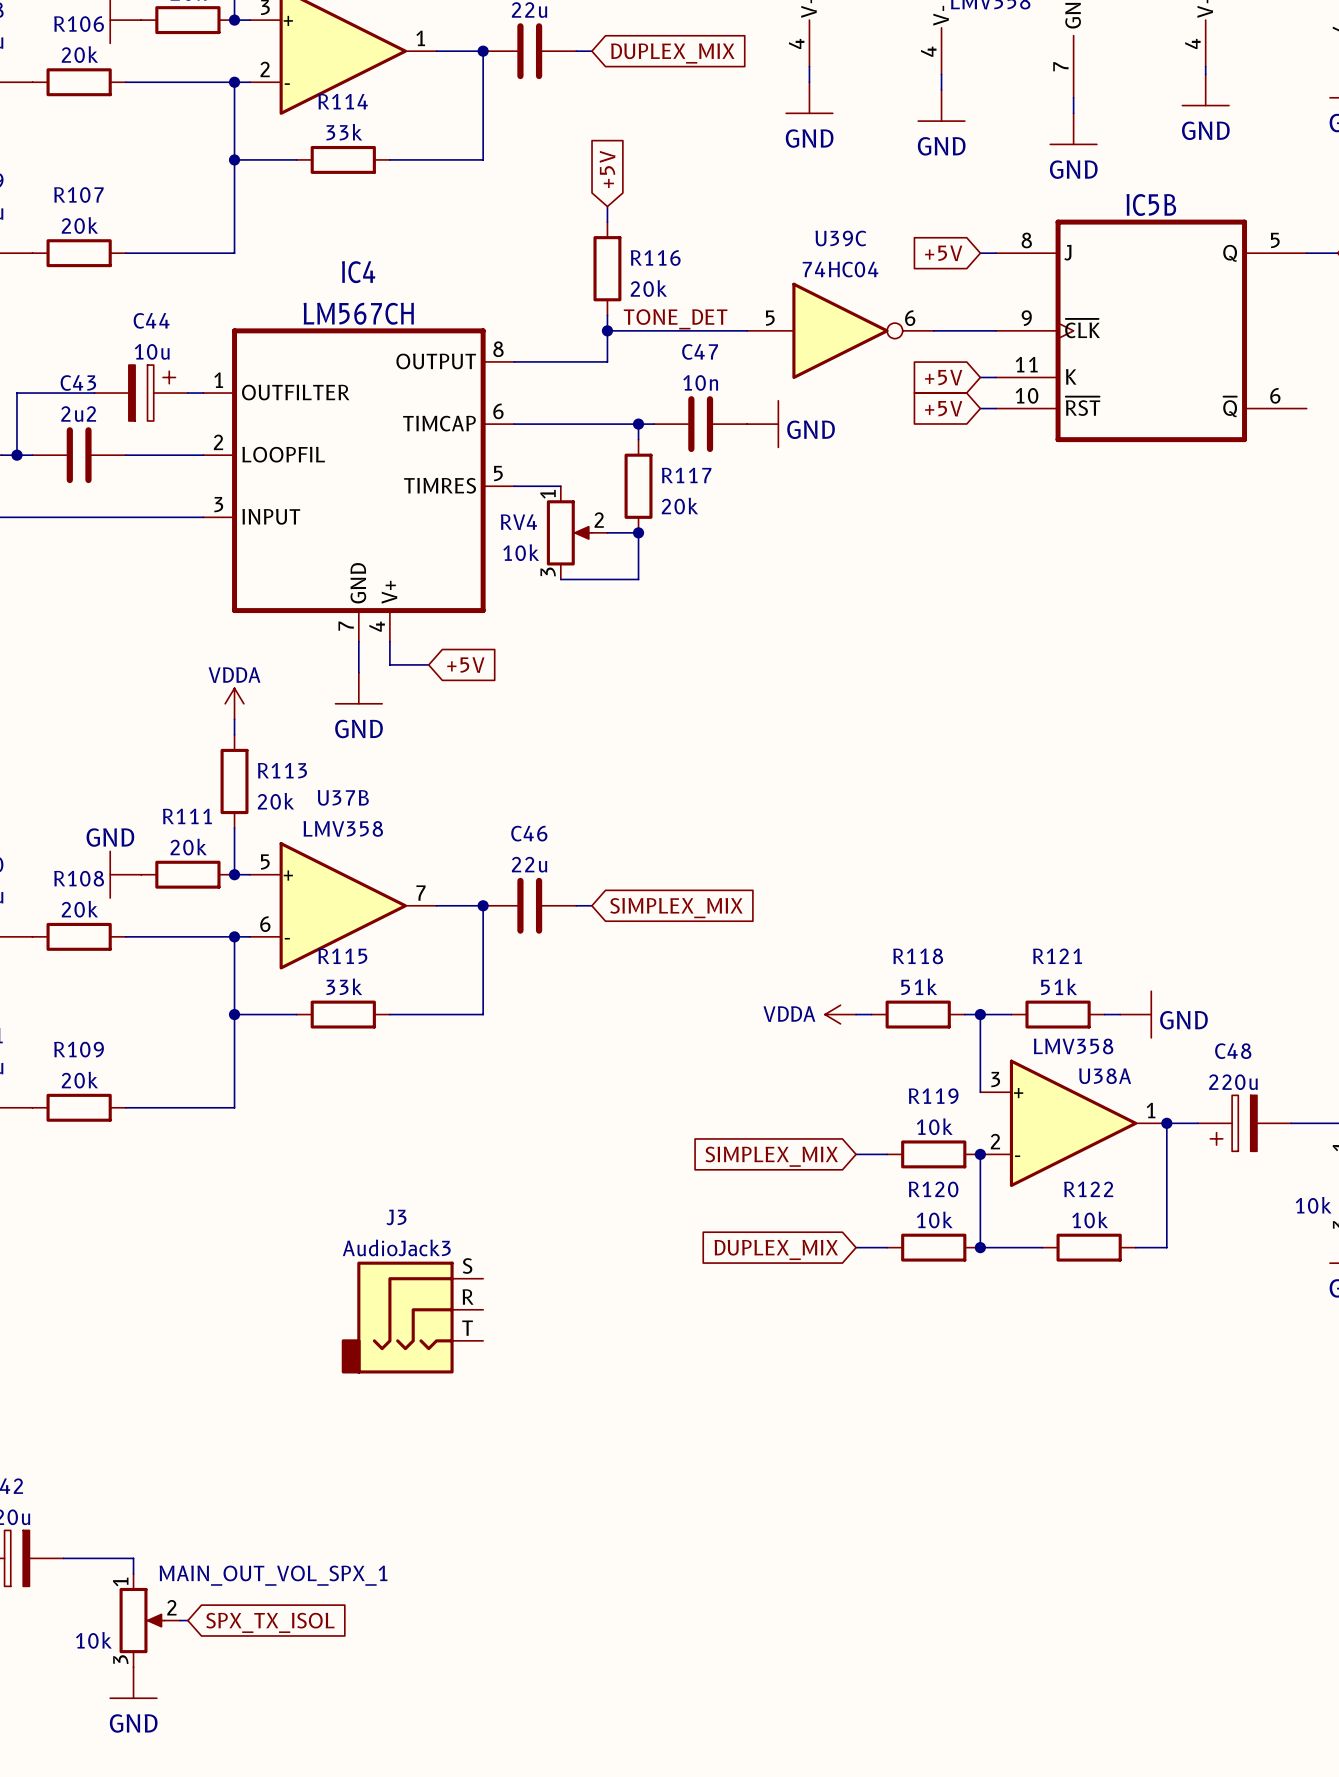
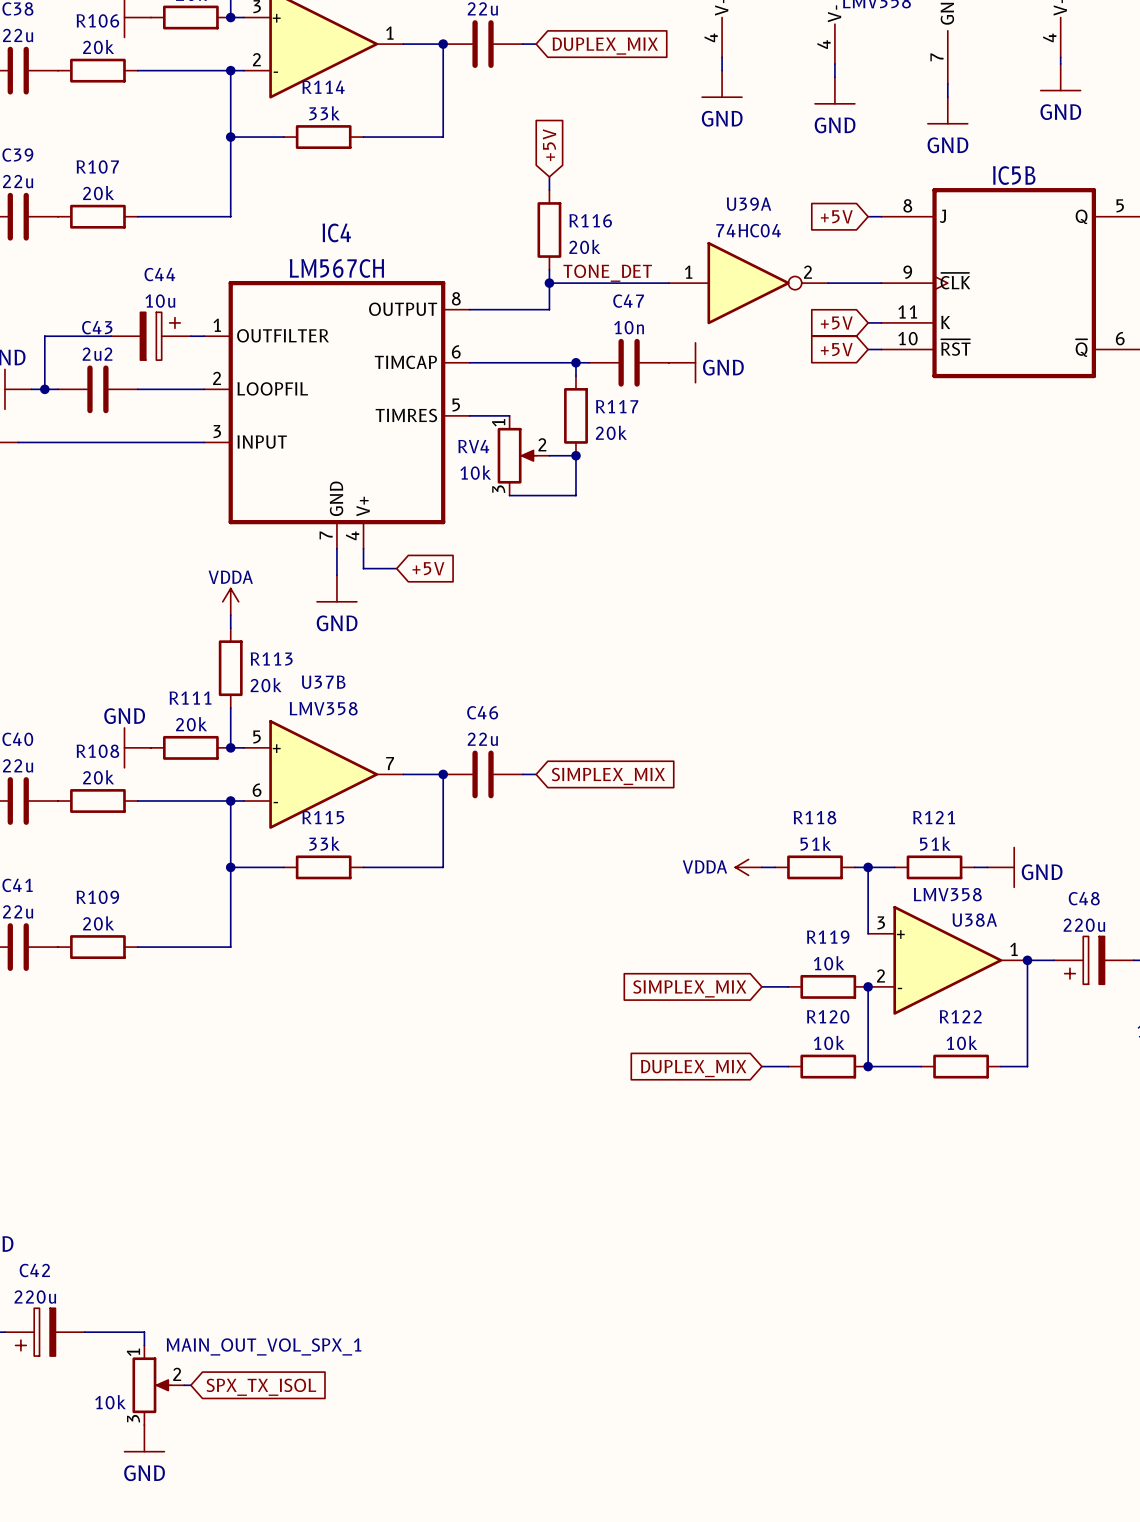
U39C name: U39C (840, 238) -> U39A (748, 204)
U39C pin number: 5 (770, 318) -> 1 (688, 272)
U39C pin number: 6 (910, 318) -> 2 (807, 272)
J3: AudioJack3 (412, 1317) -> none

